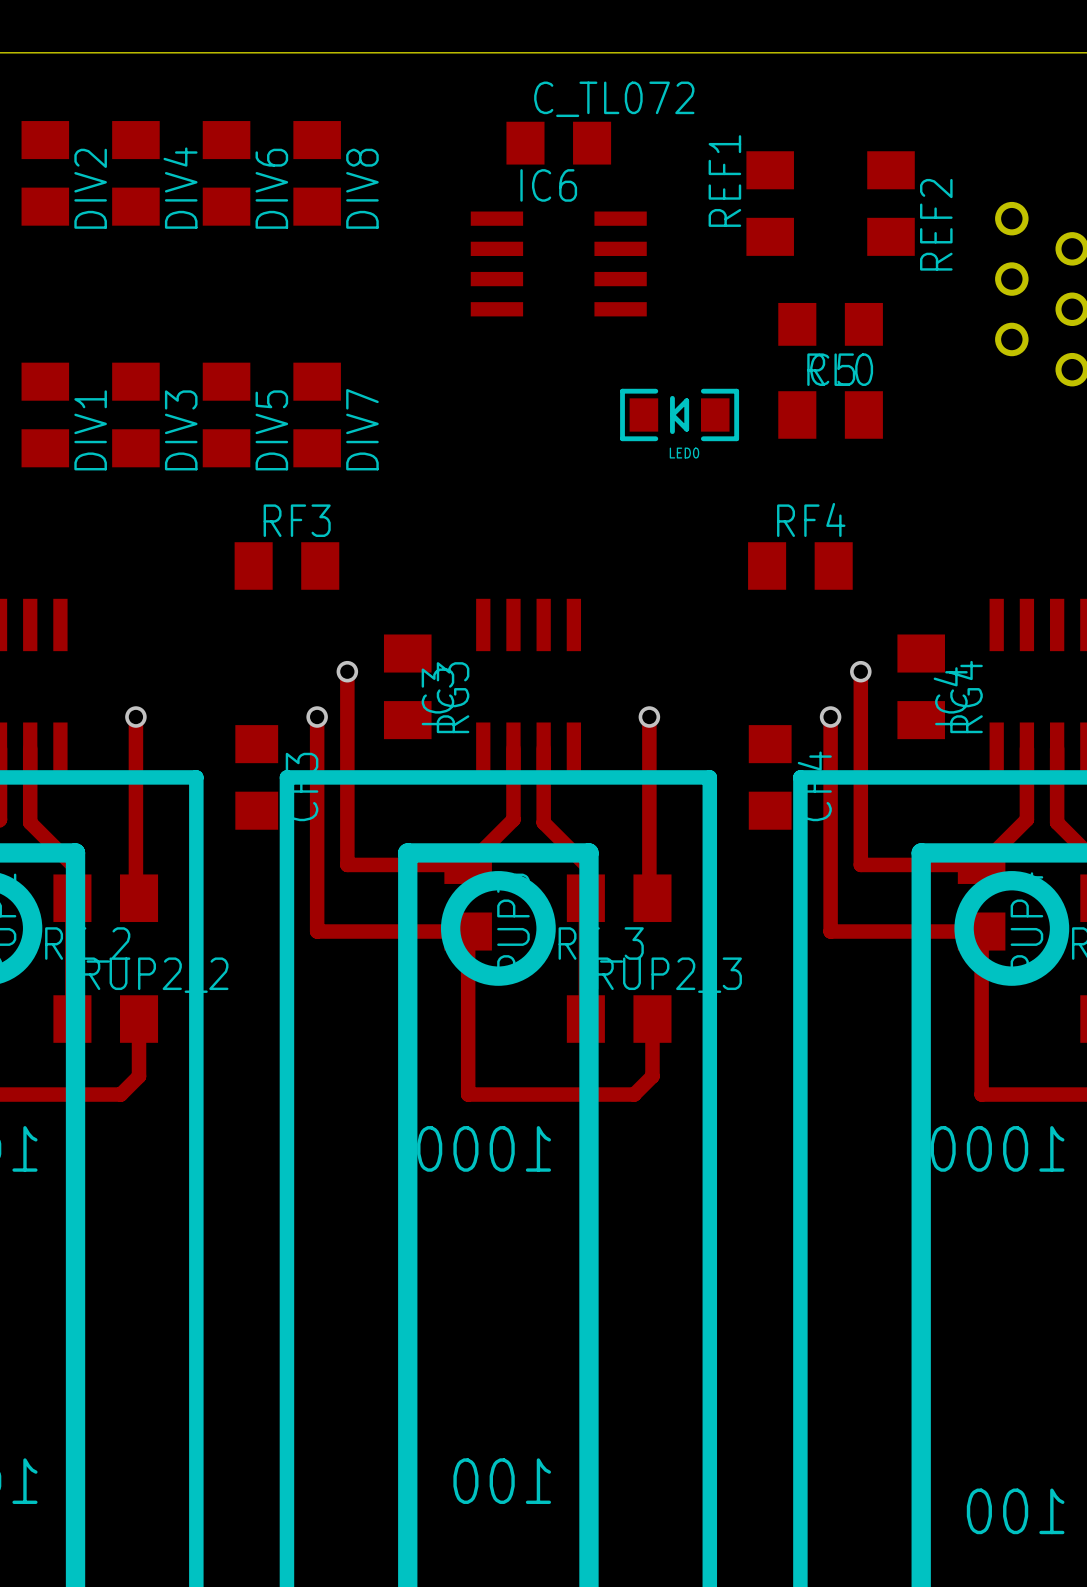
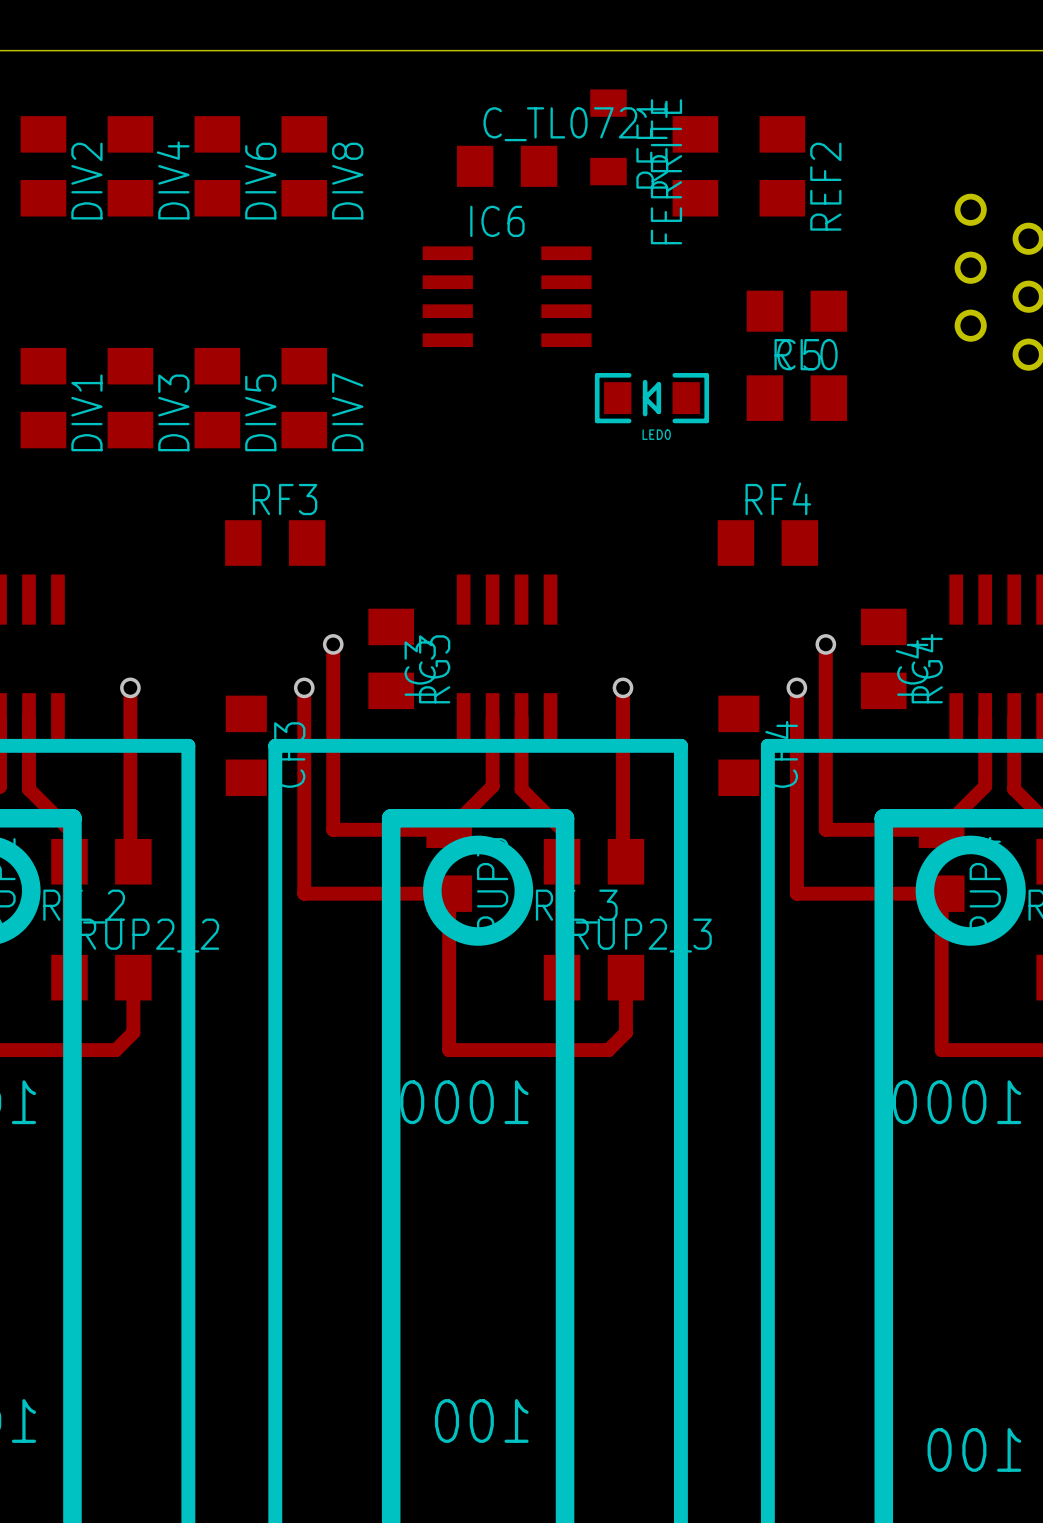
C_TL072 position: (558, 143) -> (507, 166)
FERRITE: none -> (608, 137)
REF1 position: (770, 203) -> (695, 166)
REF2 position: (891, 203) -> (782, 166)
IC6 position: (558, 263) -> (507, 296)

